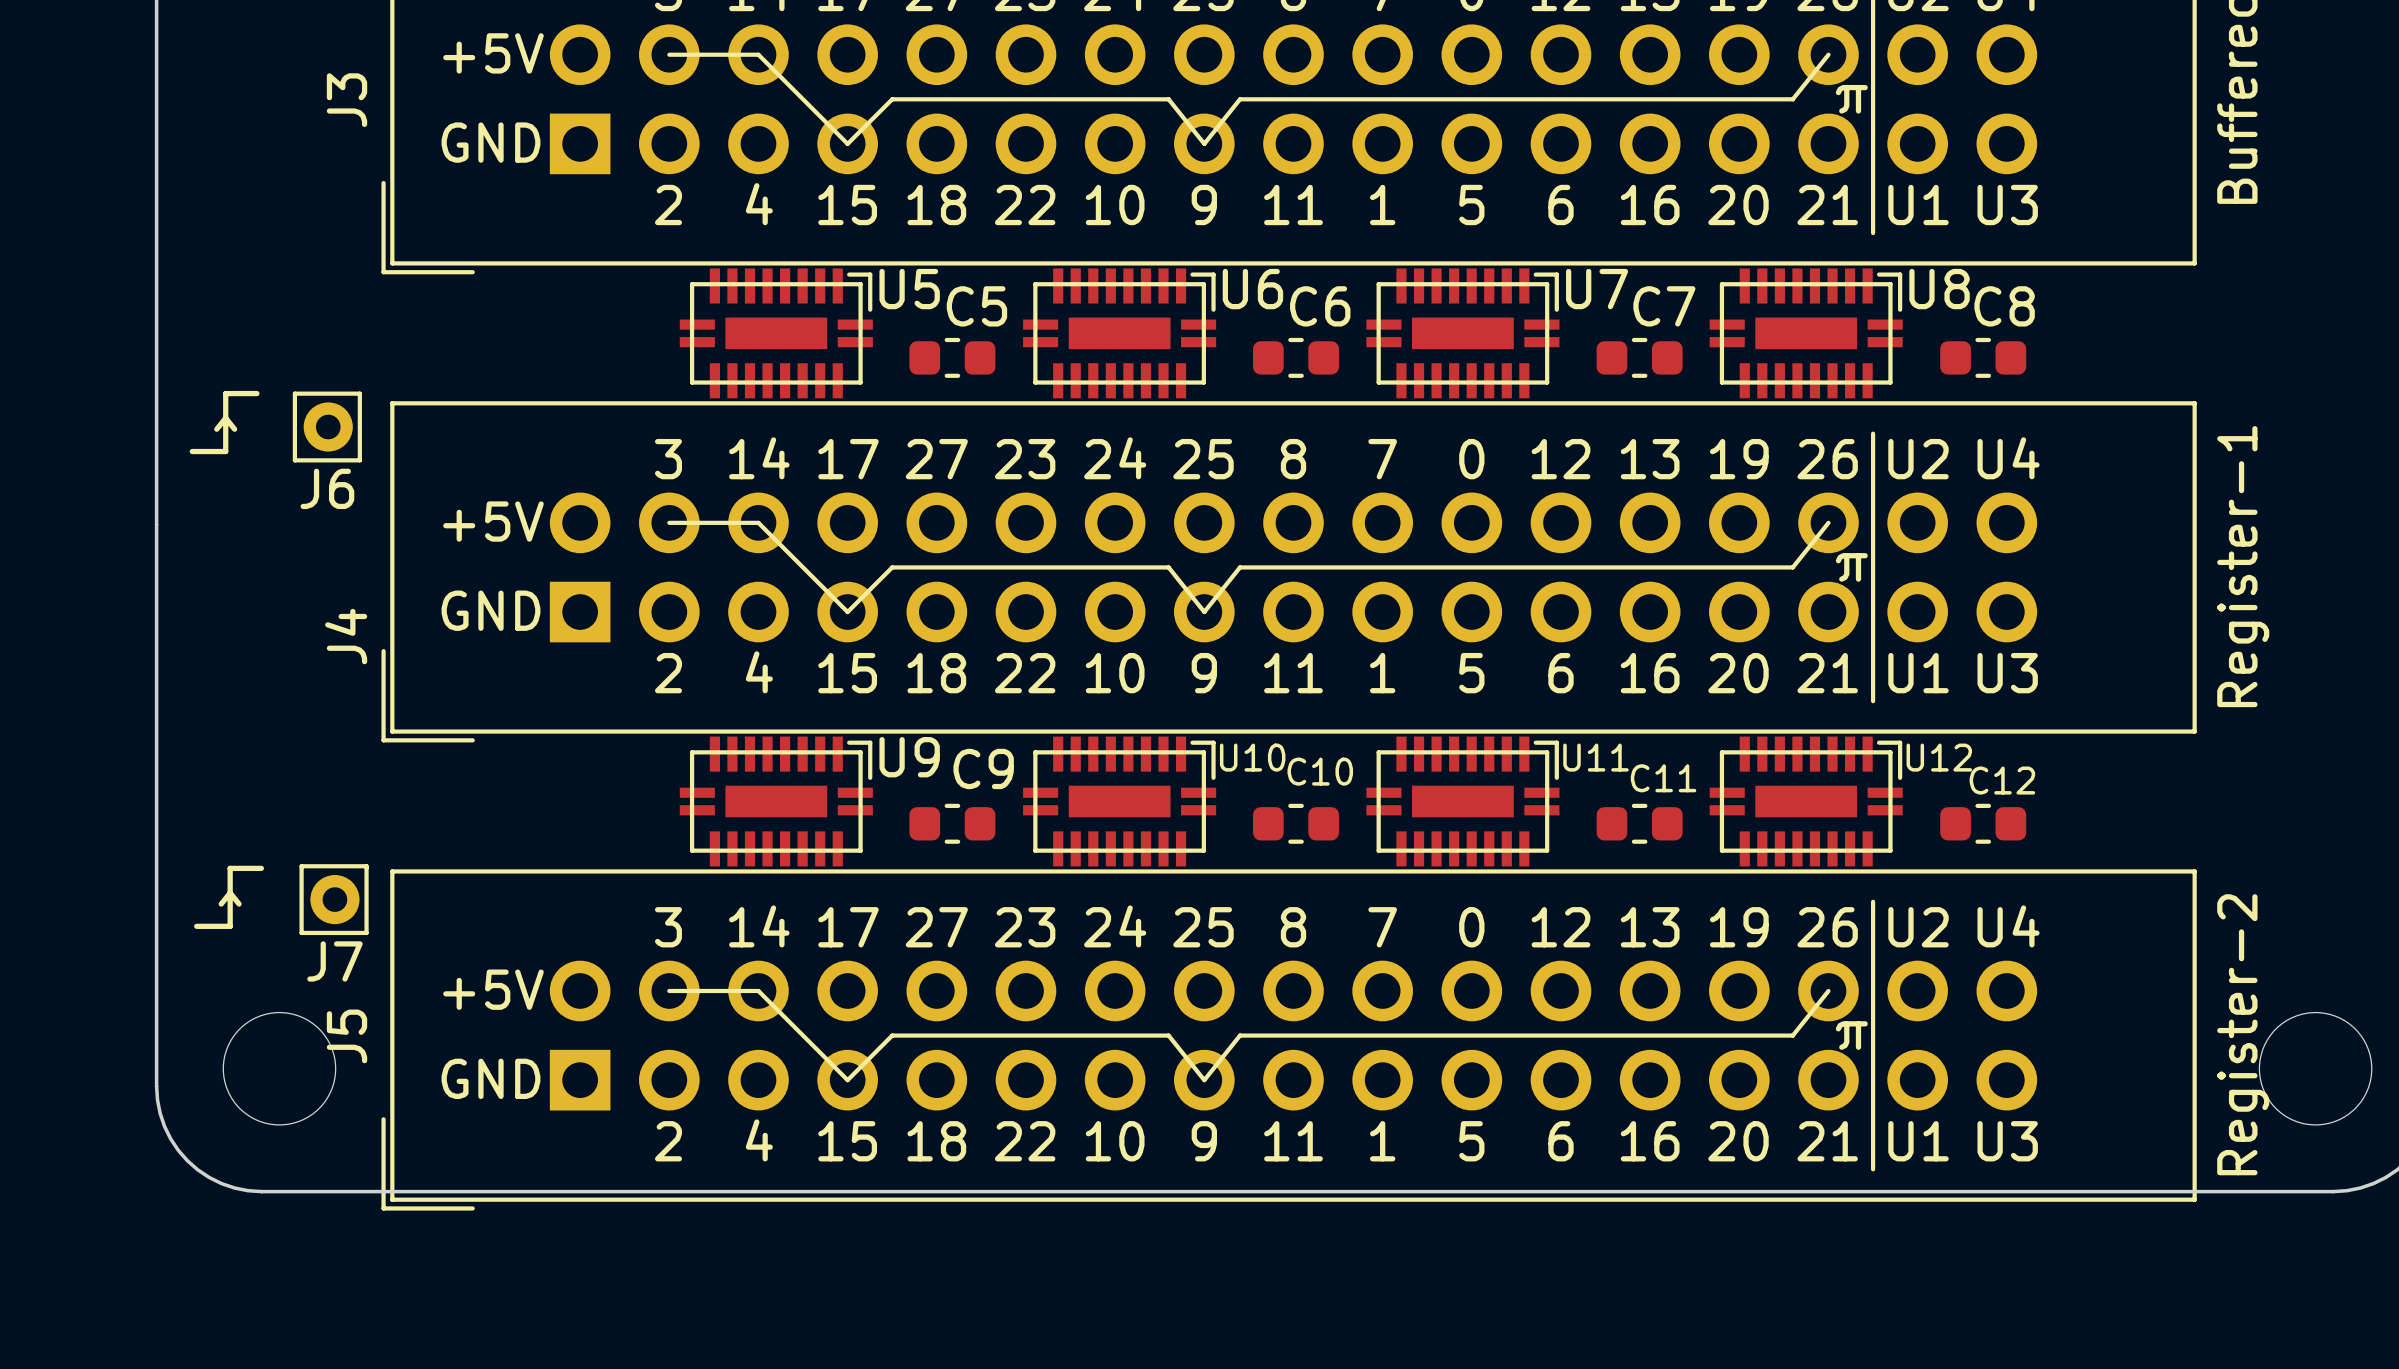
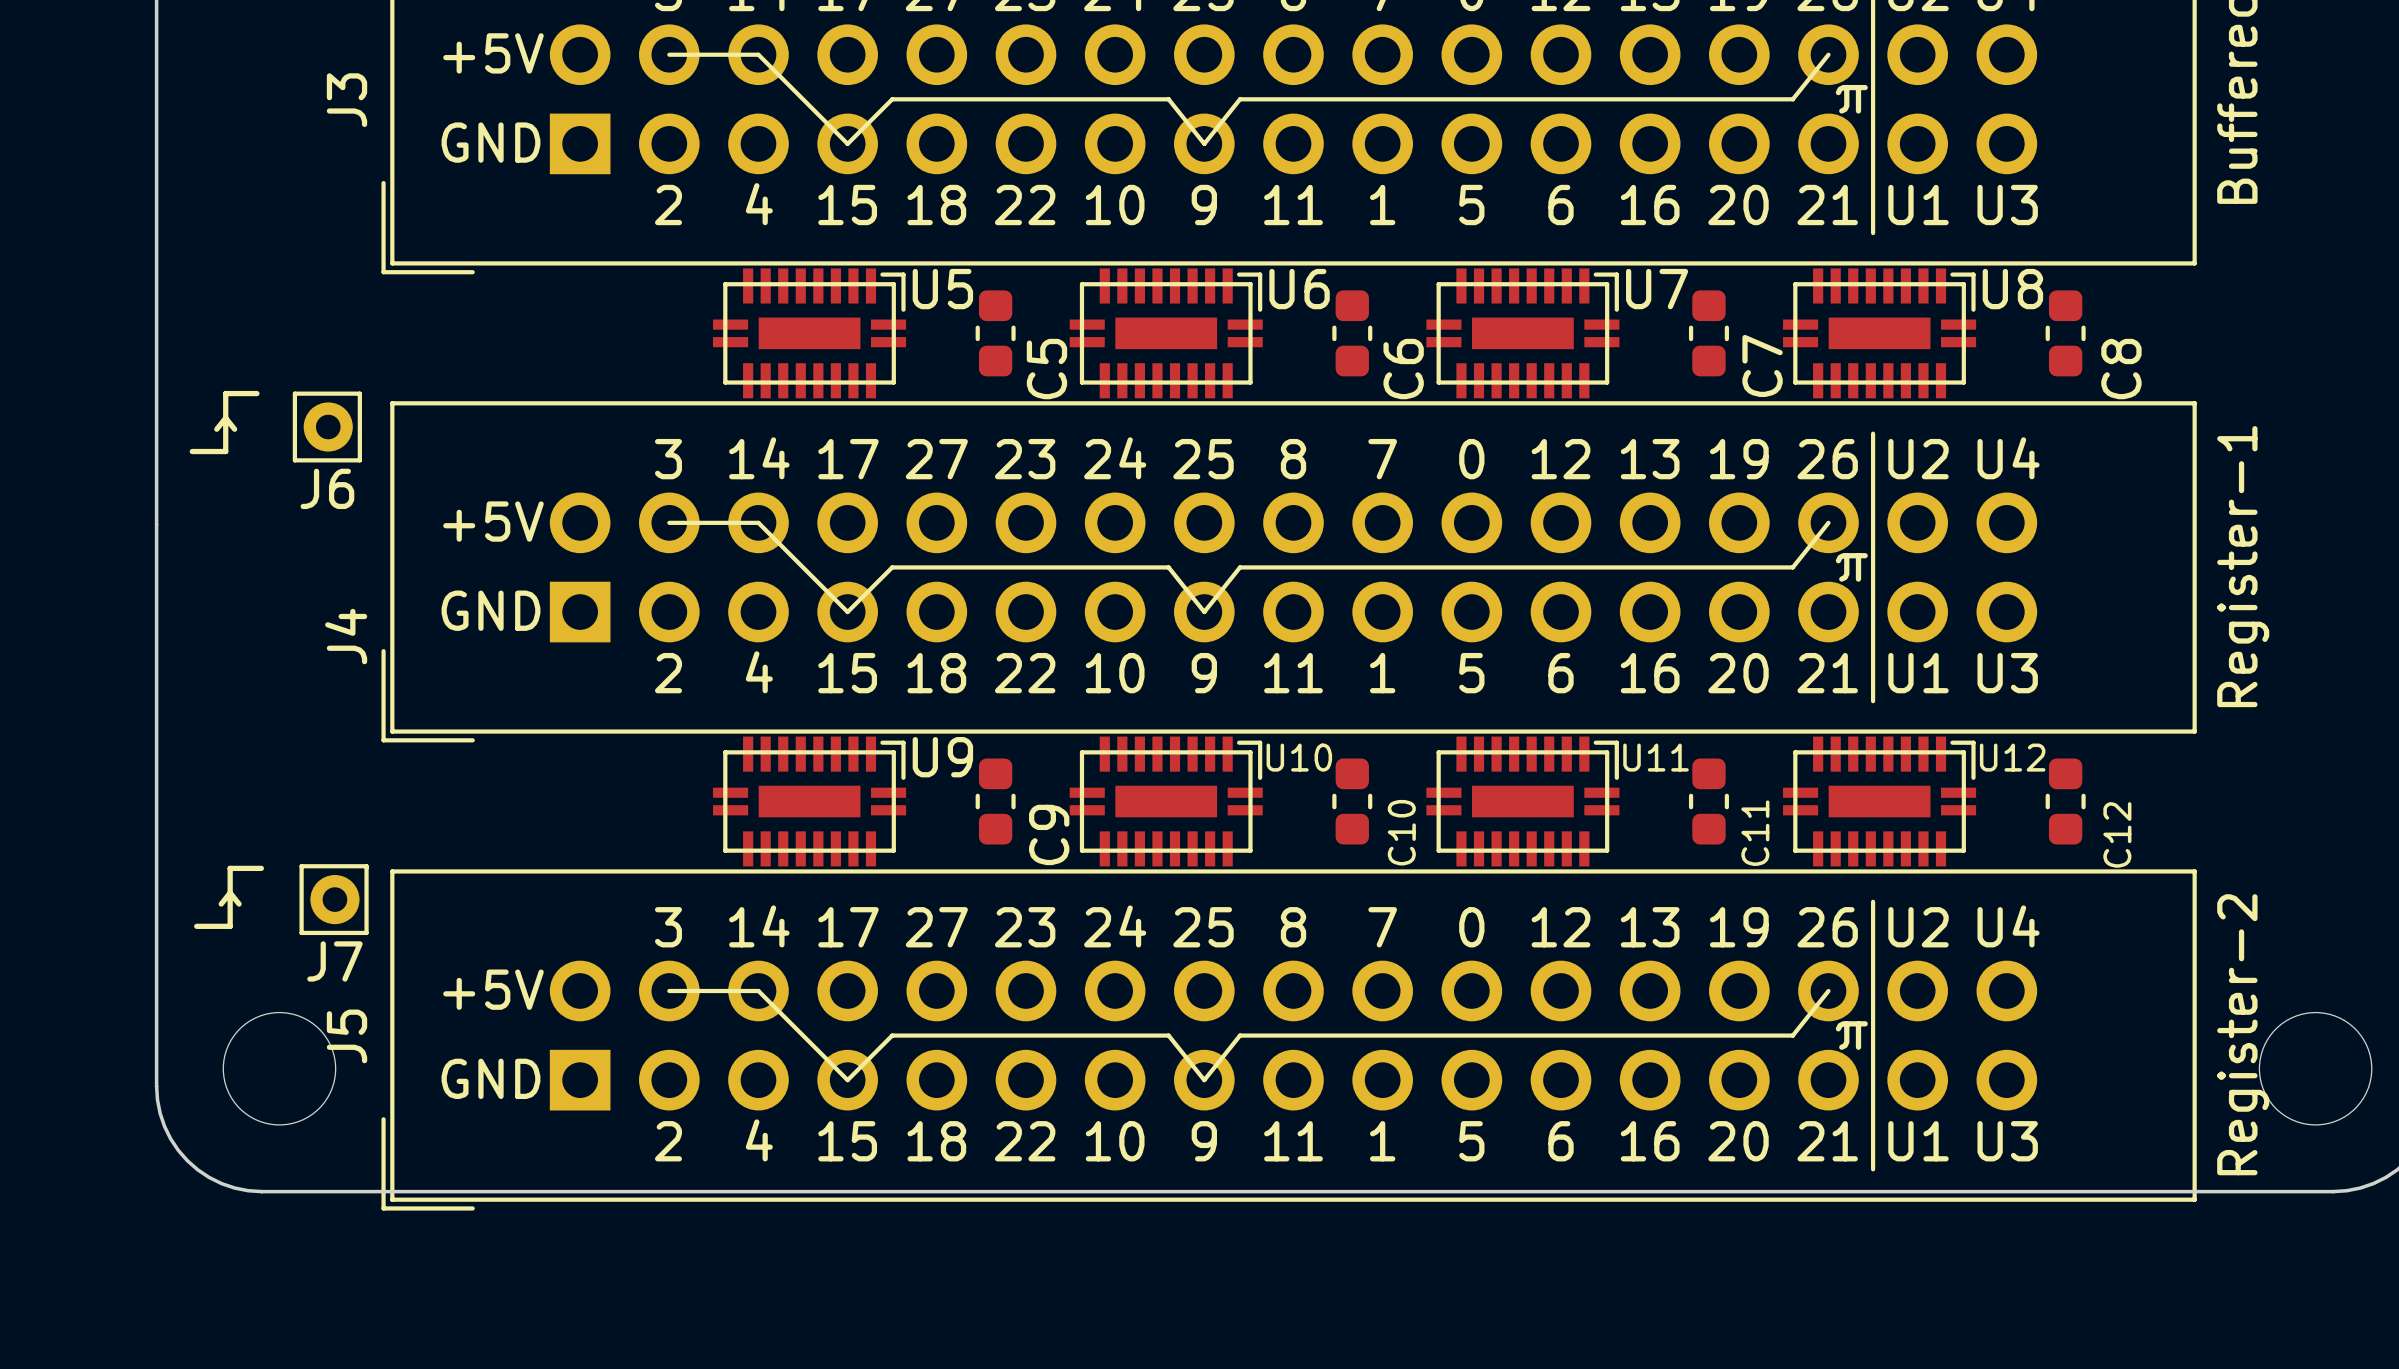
U5 position: (776, 333) -> (809, 333)
U6 position: (1119, 333) -> (1166, 333)
U7 position: (1462, 333) -> (1522, 333)
U8 position: (1806, 333) -> (1879, 333)
C5 rotation: 0° (952, 357) -> 90° clockwise (995, 333)
C6 rotation: 0° (1296, 357) -> 90° clockwise (1352, 333)
C6 position: (1296, 357) -> (1352, 333)
C7 rotation: 0° (1639, 357) -> 90° clockwise (1708, 333)
C7 position: (1639, 357) -> (1708, 333)
C8 rotation: 0° (1983, 357) -> 90° clockwise (2065, 333)
C8 position: (1983, 357) -> (2065, 333)
U9 position: (776, 801) -> (809, 801)
U10 position: (1119, 801) -> (1166, 801)
U11 position: (1462, 801) -> (1522, 801)
U12 position: (1806, 801) -> (1879, 801)
C9 rotation: 0° (952, 823) -> 90° clockwise (995, 801)
C10 rotation: 0° (1296, 823) -> 90° clockwise (1352, 801)
C10 position: (1296, 823) -> (1352, 801)
C11 rotation: 0° (1639, 823) -> 90° clockwise (1708, 801)
C11 position: (1639, 823) -> (1708, 801)
C12 rotation: 0° (1983, 823) -> 90° clockwise (2065, 801)
C12 position: (1983, 823) -> (2065, 801)

